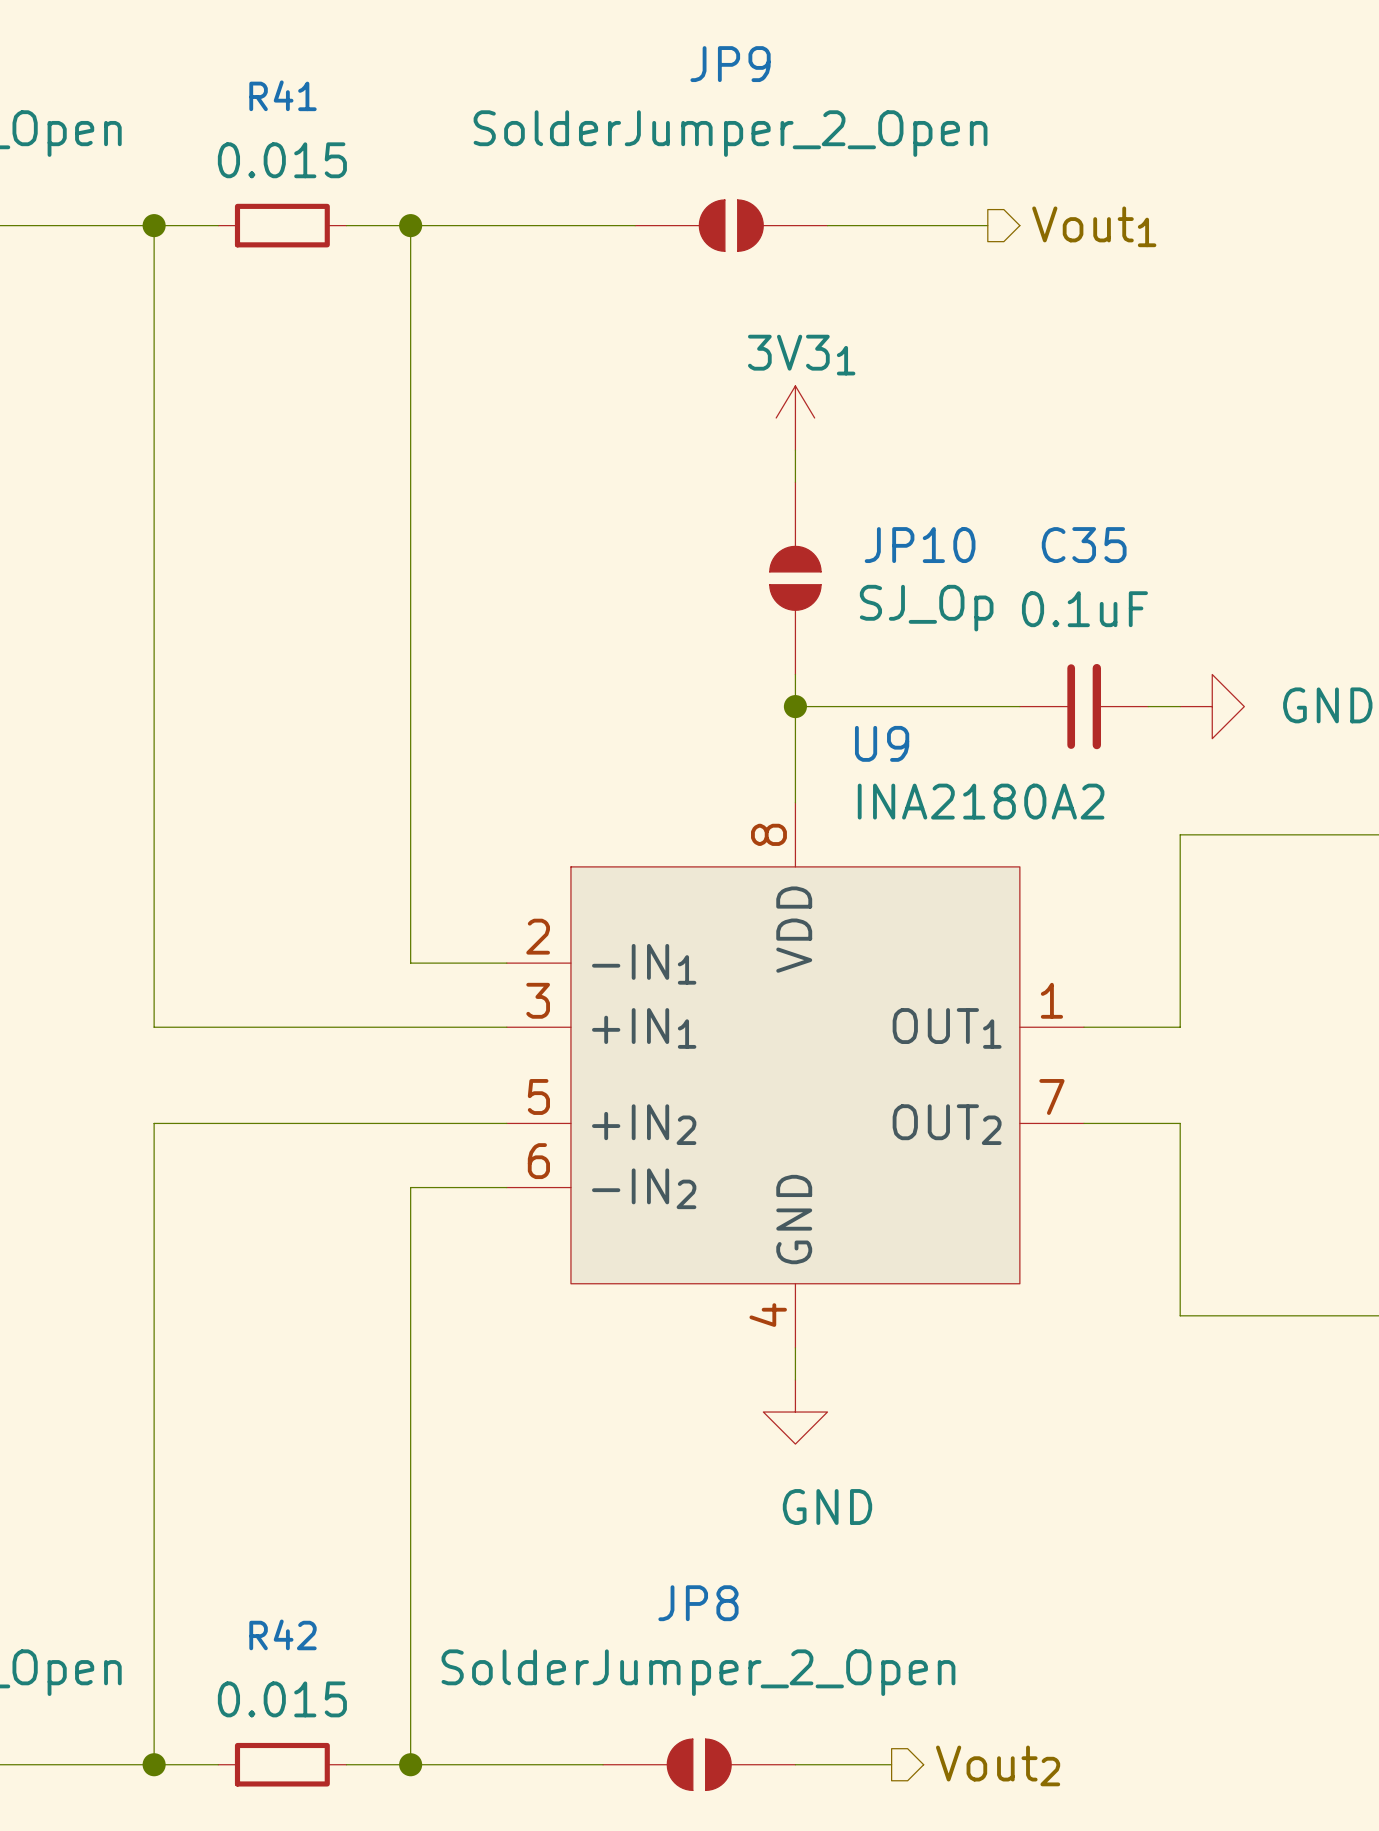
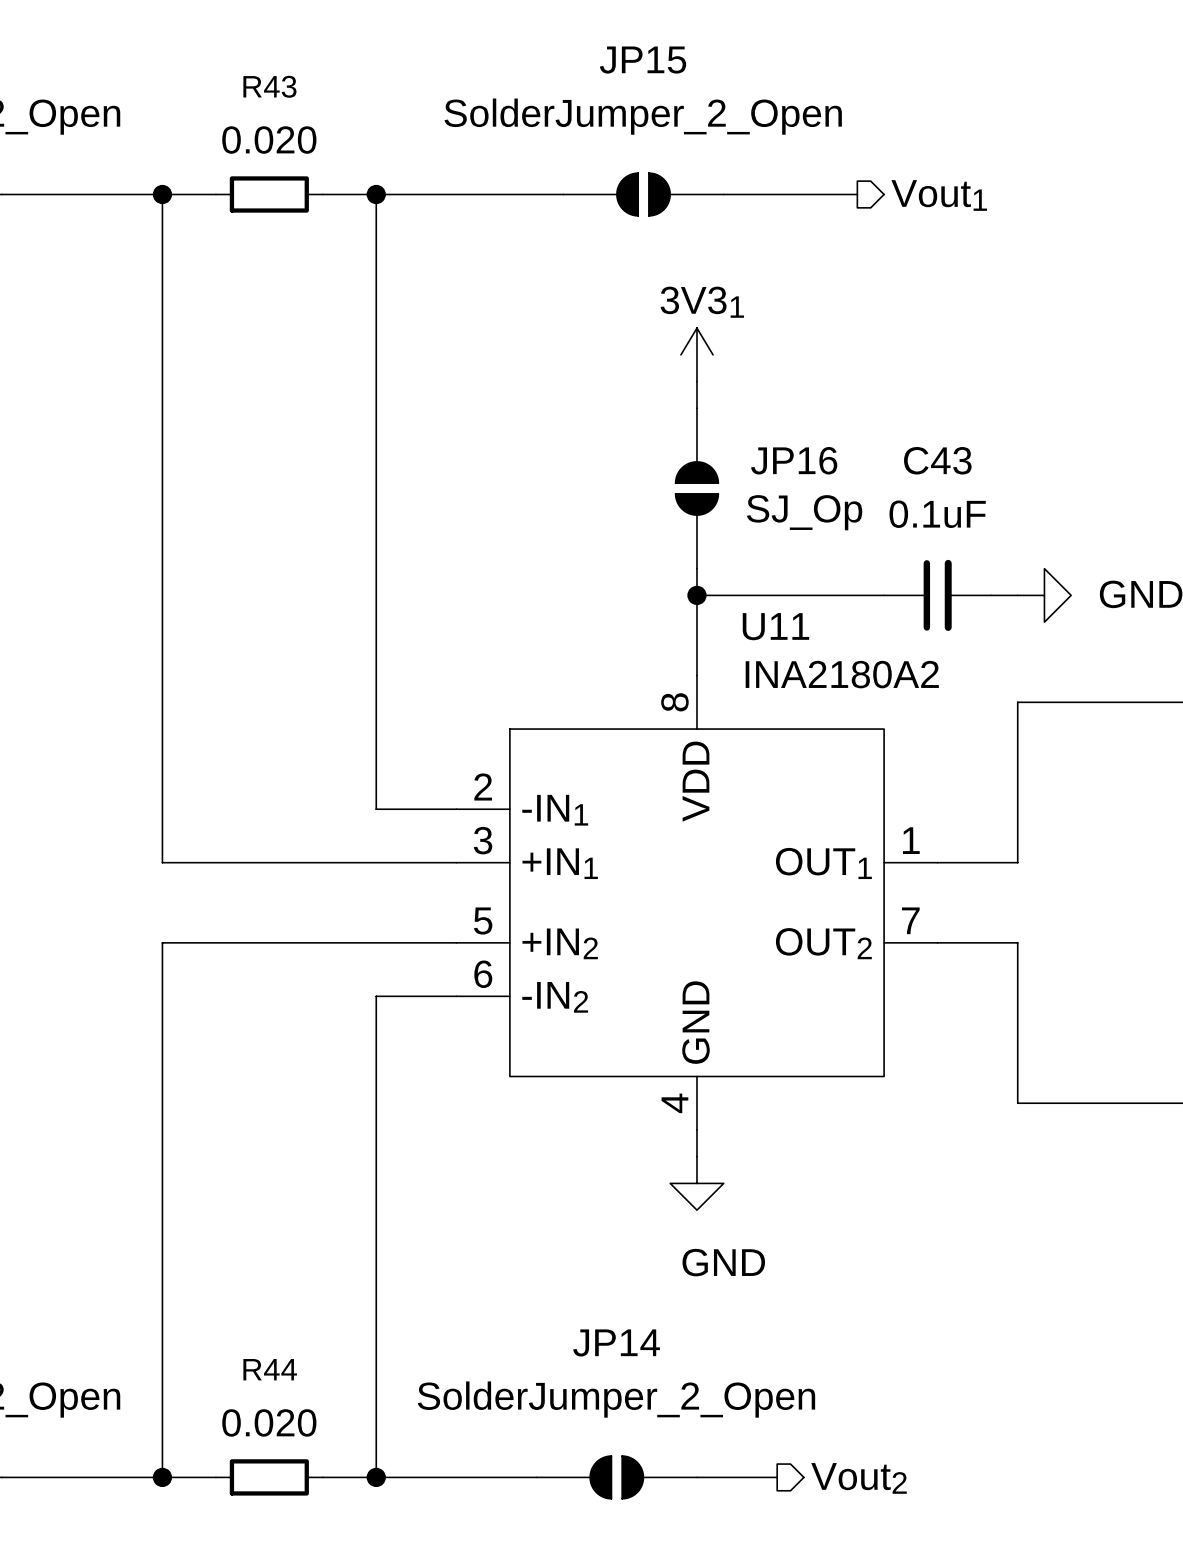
JP9 name: JP9 (730, 64) -> JP15 (643, 60)
R41 name: R41 (282, 95) -> R43 (269, 86)
R41 value: 0.015 (282, 160) -> 0.020 (269, 140)
JP10 name: JP10 (920, 545) -> JP16 (794, 460)
C35 name: C35 (1084, 545) -> C43 (937, 460)
U9 name: U9 (882, 743) -> U11 (775, 626)
JP8 name: JP8 (698, 1603) -> JP14 (616, 1342)
R42 name: R42 (282, 1634) -> R44 (270, 1369)
R42 value: 0.015 (282, 1699) -> 0.020 (269, 1422)

